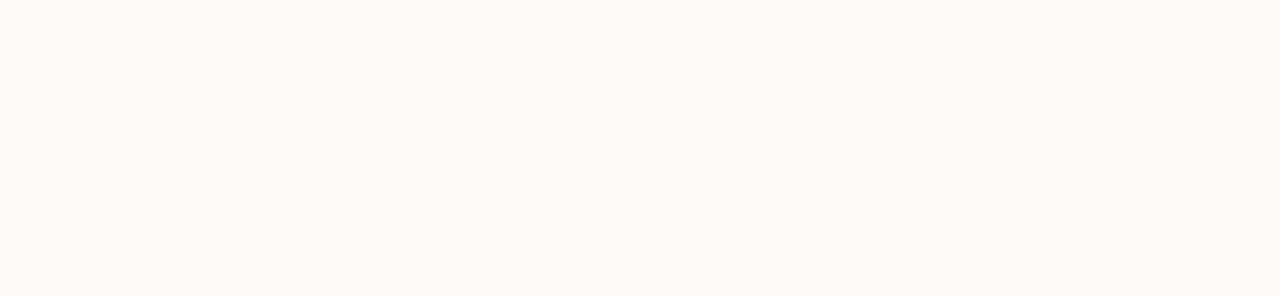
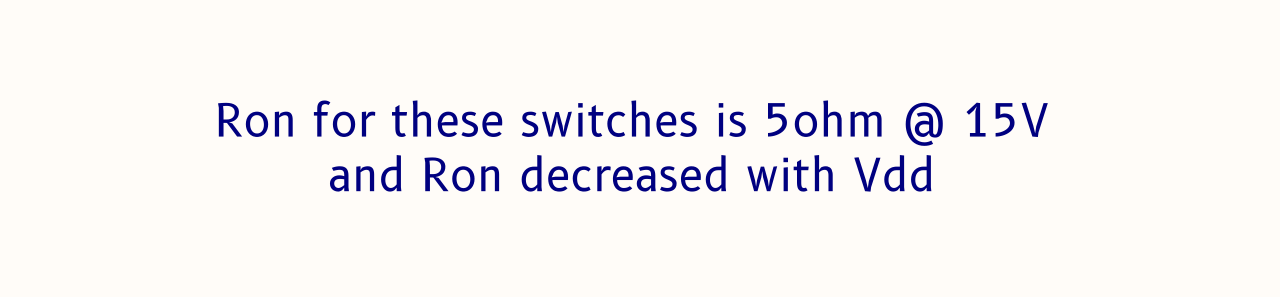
text: none -> Ron for these switches is 5ohm @ 15V (632, 123)
text: none -> and Ron decreased with Vdd (630, 173)

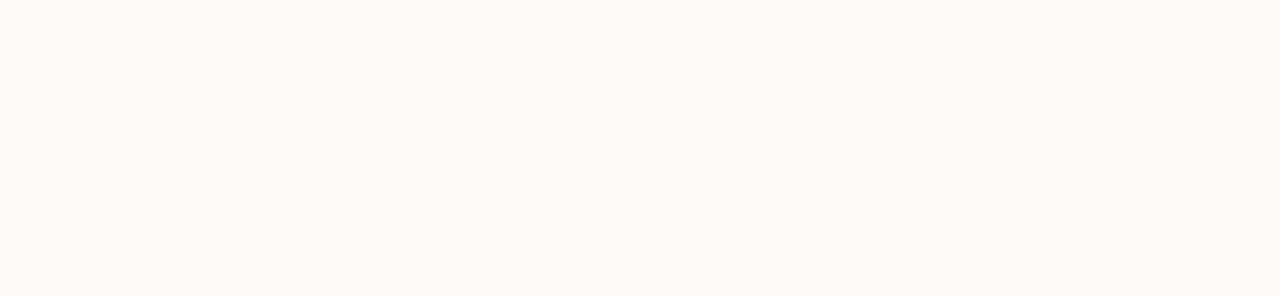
text: Ron for these switches is 5ohm @ 15V (632, 123) -> none
text: and Ron decreased with Vdd (630, 173) -> none

